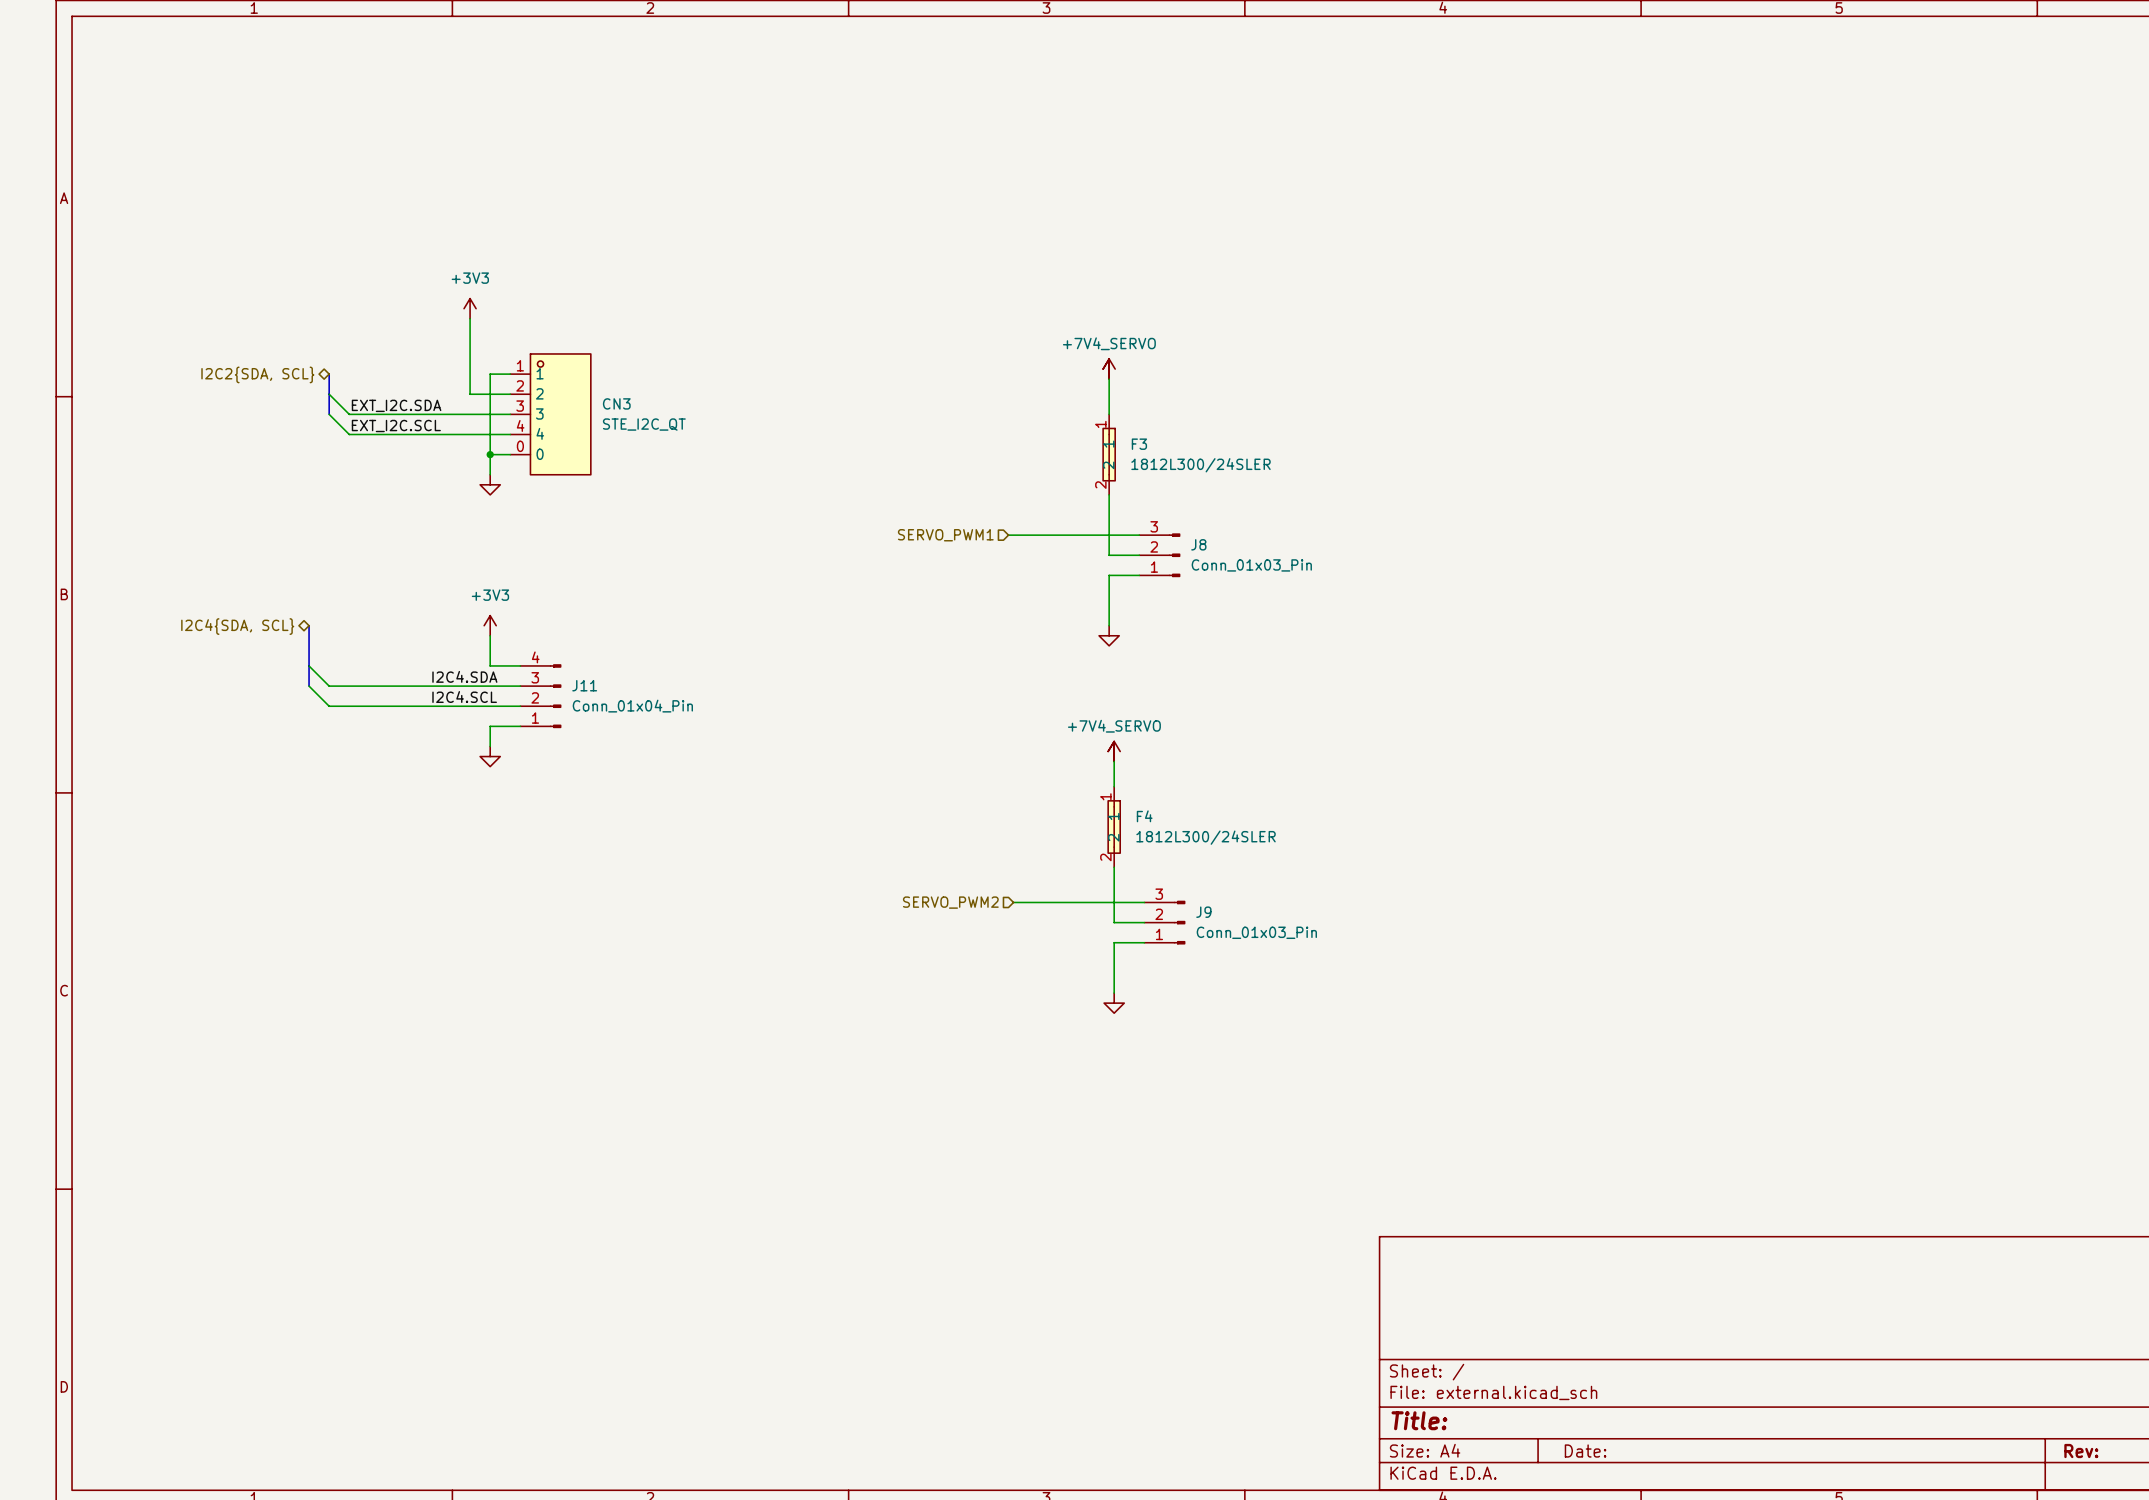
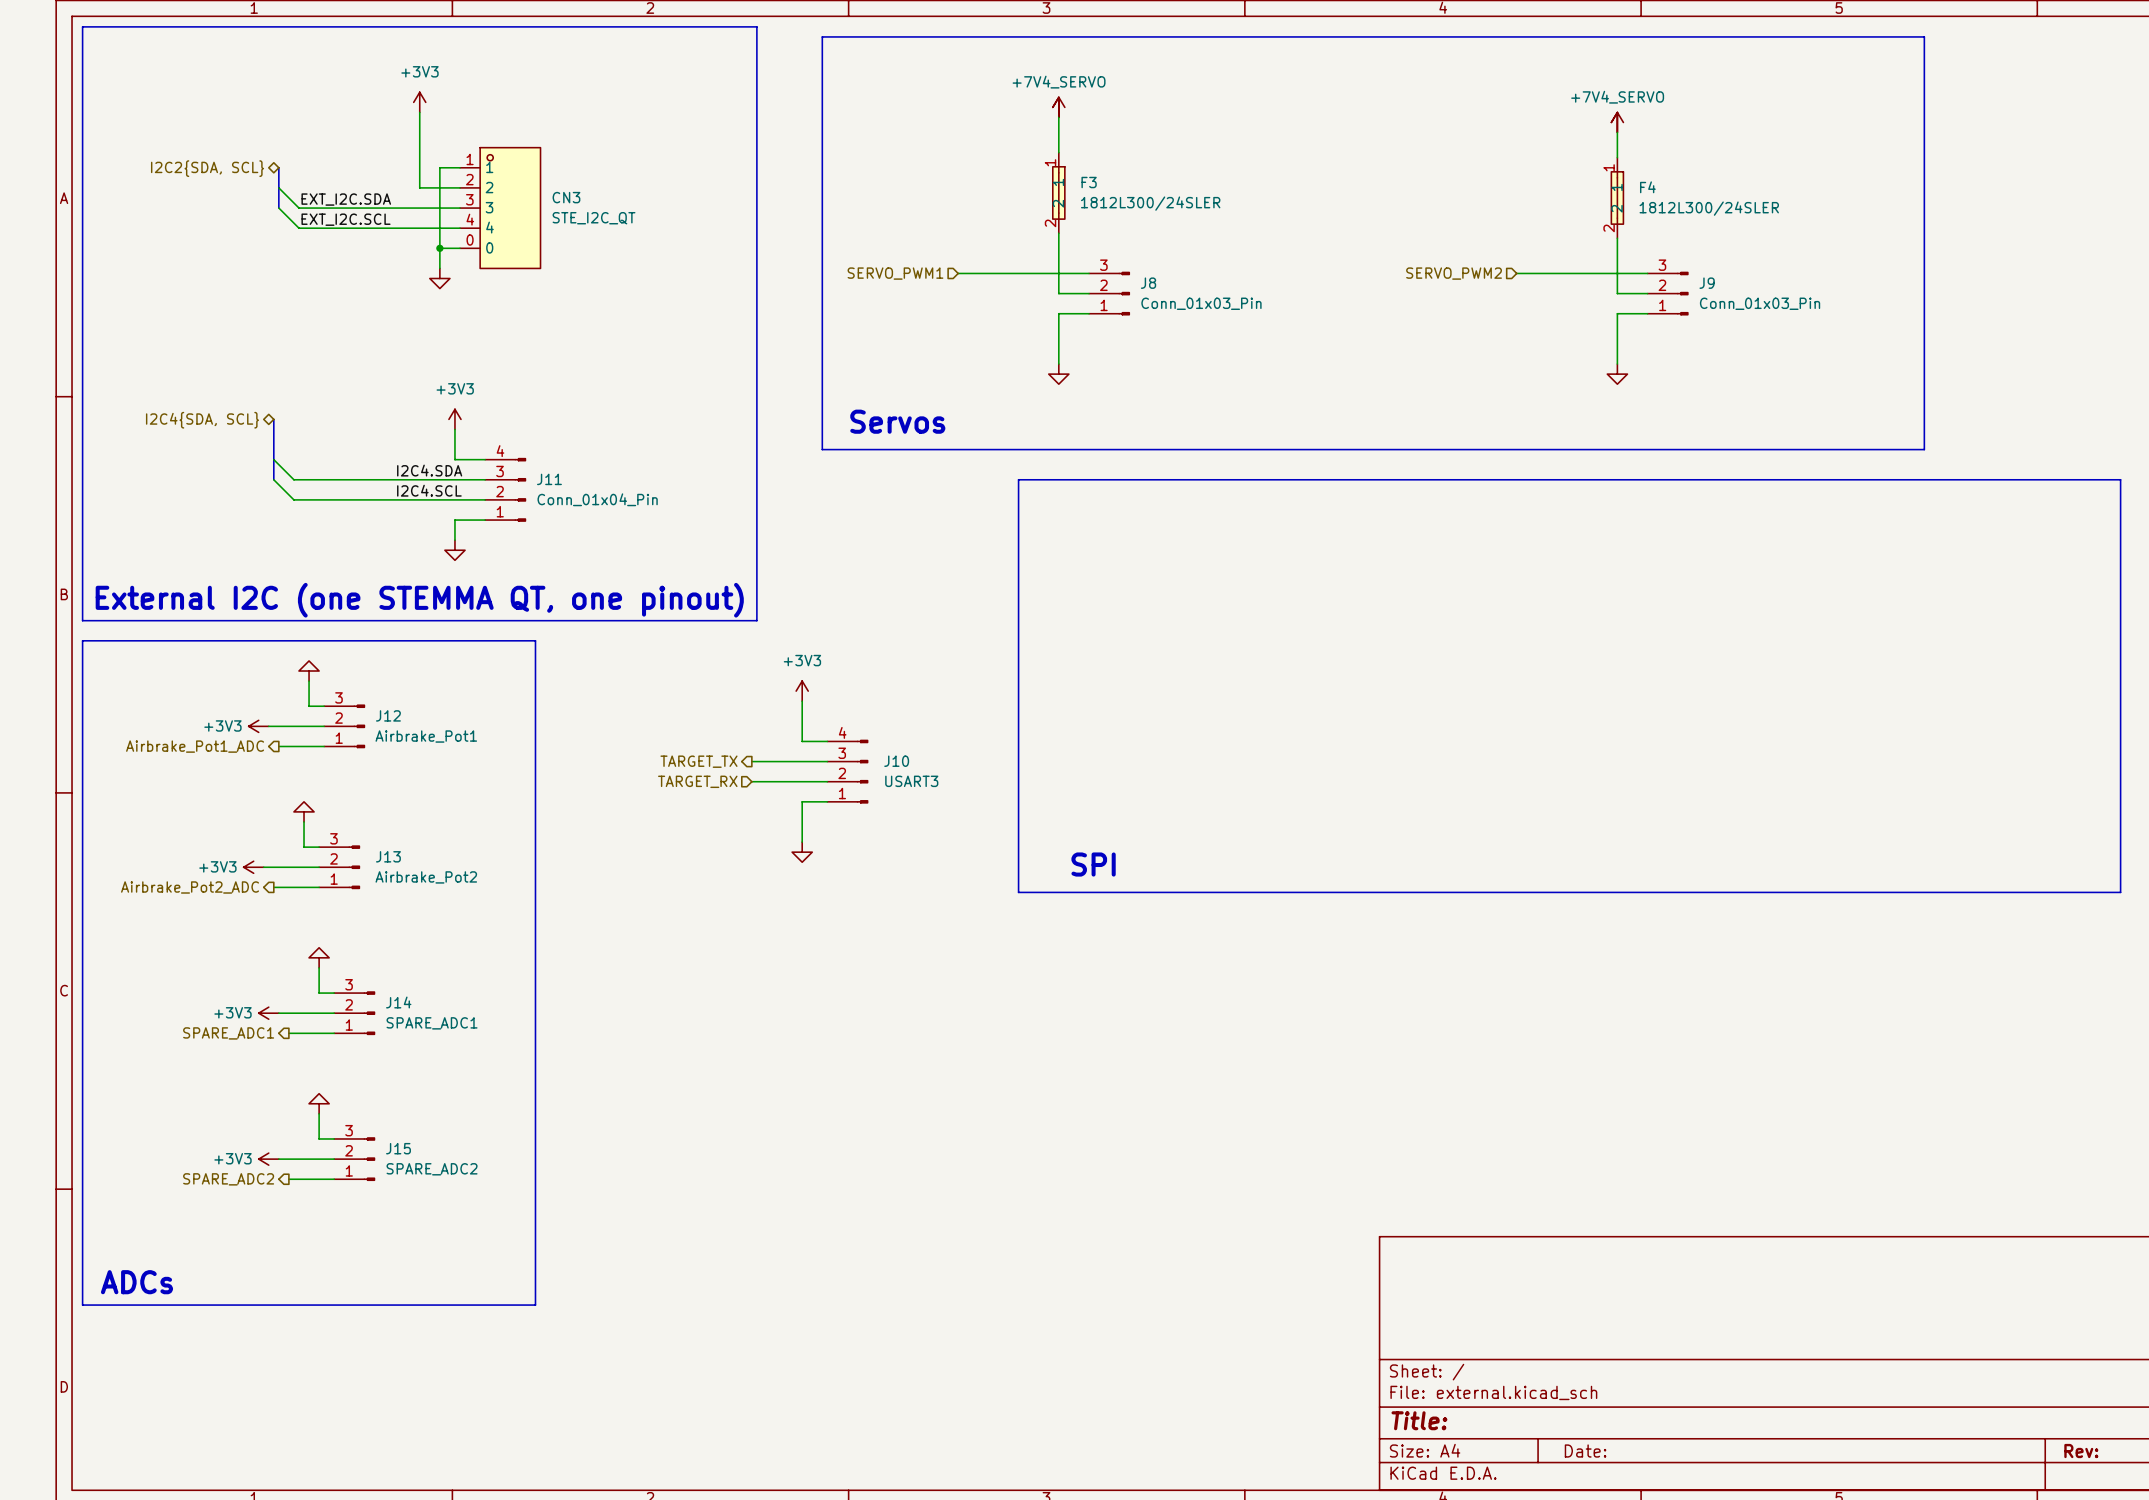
line: none -> (82, 26) (756, 26) (756, 620) (82, 620) (82, 26)
line: none -> (822, 36) (1924, 36) (1924, 449) (822, 449) (822, 36)
power symbol: none -> +3V3 (419, 102)
power symbol: none -> +7V4_SERVO (1058, 107)
wire: none -> (419, 112) (419, 187) (460, 187)
wire: none -> (1058, 117) (1058, 152)
power symbol: none -> +7V4_SERVO (1617, 122)
wire: none -> (1617, 132) (1617, 157)
bus: none -> (278, 167) (278, 208)
wire: none -> (460, 167) (439, 167) (439, 268)
hierarchical label: none -> I2C2{SDA, SCL} (207, 168)
wire: none -> (278, 187) (298, 208) (460, 208)
label: none -> EXT_I2C.SDA (346, 199)
label: none -> EXT_I2C.SCL (346, 219)
wire: none -> (1058, 233) (1058, 293) (1089, 293)
wire: none -> (1617, 238) (1617, 293) (1647, 293)
wire: none -> (439, 248) (460, 248)
junction: none -> (439, 248)
hierarchical label: none -> SERVO_PWM1 (895, 273)
wire: none -> (958, 273) (1089, 273)
hierarchical label: none -> SERVO_PWM2 (1454, 273)
wire: none -> (1516, 273) (1647, 273)
power symbol: none -> (439, 278)
power symbol: +3V3 (470, 308) -> none
wire: none -> (1089, 313) (1058, 313) (1058, 364)
wire: none -> (1647, 313) (1617, 313) (1617, 364)
wire: (470, 318) (470, 394) (510, 394) -> none
power symbol: +7V4_SERVO (1109, 369) -> none
hierarchical label: I2C2{SDA, SCL} (257, 374) -> none
bus: (329, 374) (329, 414) -> none
wire: (510, 374) (490, 374) (490, 474) -> none
power symbol: none -> (1058, 374)
power symbol: none -> (1617, 374)
wire: (1109, 379) (1109, 414) -> none
wire: (329, 394) (349, 414) (510, 414) -> (278, 208) (298, 228) (460, 228)
label: EXT_I2C.SDA (396, 405) -> none
wire: (329, 414) (349, 434) (510, 434) -> none
CN3 position: (550, 414) -> (500, 208)
bus: none -> (273, 419) (273, 479)
power symbol: none -> +3V3 (454, 419)
hierarchical label: none -> I2C4{SDA, SCL} (202, 420)
text: none -> Servos (897, 421)
label: EXT_I2C.SCL (396, 425) -> none
wire: none -> (454, 429) (454, 459) (485, 459)
wire: (490, 454) (510, 454) -> none
junction: (490, 454) -> none
F3 position: (1109, 454) -> (1058, 192)
wire: none -> (273, 459) (293, 479) (485, 479)
label: none -> I2C4.SDA (429, 470)
line: none -> (1018, 479) (2120, 479) (2120, 892) (1018, 892) (1018, 479)
power symbol position: (490, 484) -> (454, 550)
label: none -> I2C4.SCL (429, 490)
wire: (1109, 494) (1109, 555) (1139, 555) -> none
wire: none -> (485, 520) (454, 520) (454, 540)
hierarchical label: SERVO_PWM1 (945, 535) -> none
wire: (1008, 535) (1139, 535) -> none
J8 position: (1159, 555) -> (1109, 293)
wire: (1139, 575) (1109, 575) (1109, 625) -> none
text: none -> External I2C (one STEMMA QT, one pinout) (419, 600)
bus: (309, 625) (309, 686) -> none
power symbol: +3V3 (490, 625) -> none
hierarchical label: I2C4{SDA, SCL} (237, 626) -> none
wire: (490, 635) (490, 665) (520, 665) -> none
power symbol: (1109, 635) -> none
line: none -> (82, 640) (535, 640) (535, 1305) (82, 1305) (82, 640)
wire: (309, 665) (329, 686) (520, 686) -> (273, 479) (293, 499) (485, 499)
power symbol: none -> (309, 671)
label: I2C4.SDA (464, 676) -> none
wire: none -> (309, 681) (309, 706) (324, 706)
wire: (309, 686) (329, 706) (520, 706) -> none
power symbol: none -> +3V3 (802, 691)
J11 position: (540, 696) -> (505, 489)
label: I2C4.SCL (464, 697) -> none
wire: none -> (802, 701) (802, 741) (827, 741)
power symbol: none -> +3V3 (258, 726)
wire: none -> (268, 726) (324, 726)
J12: none -> Airbrake_Pot1 (344, 726)
wire: (520, 726) (490, 726) (490, 746) -> none
hierarchical label: none -> Airbrake_Pot1_ADC (195, 746)
wire: none -> (278, 746) (324, 746)
power symbol: +7V4_SERVO (1114, 751) -> none
power symbol: (490, 756) -> none
hierarchical label: none -> TARGET_TX (698, 761)
wire: none -> (751, 761) (827, 761)
wire: (1114, 761) (1114, 786) -> none
J10: none -> USART3 (847, 771)
hierarchical label: none -> TARGET_RX (697, 781)
wire: none -> (751, 781) (827, 781)
wire: none -> (827, 801) (802, 801) (802, 842)
power symbol: none -> (304, 811)
wire: none -> (304, 821) (304, 847) (319, 847)
F4 position: (1114, 827) -> (1617, 197)
power symbol: none -> (802, 852)
text: none -> SPI (1093, 864)
power symbol: none -> +3V3 (253, 867)
wire: none -> (263, 867) (319, 867)
J13: none -> Airbrake_Pot2 (339, 867)
wire: (1114, 867) (1114, 922) (1144, 922) -> none
hierarchical label: none -> Airbrake_Pot2_ADC (190, 887)
wire: none -> (273, 887) (319, 887)
hierarchical label: SERVO_PWM2 (950, 902) -> none
wire: (1013, 902) (1144, 902) -> none
J9 position: (1164, 922) -> (1668, 293)
wire: (1144, 942) (1114, 942) (1114, 993) -> none
power symbol: none -> (319, 957)
wire: none -> (319, 967) (319, 993) (334, 993)
power symbol: (1114, 1003) -> none
power symbol: none -> +3V3 (268, 1013)
wire: none -> (278, 1013) (334, 1013)
J14: none -> SPARE_ADC1 (354, 1013)
hierarchical label: none -> SPARE_ADC1 (228, 1033)
wire: none -> (288, 1033) (334, 1033)
power symbol: none -> (319, 1103)
wire: none -> (319, 1113) (319, 1138) (334, 1138)
power symbol: none -> +3V3 (268, 1159)
wire: none -> (278, 1159) (334, 1159)
J15: none -> SPARE_ADC2 (354, 1159)
hierarchical label: none -> SPARE_ADC2 (228, 1179)
wire: none -> (288, 1179) (334, 1179)
text: none -> ADCs (136, 1282)

